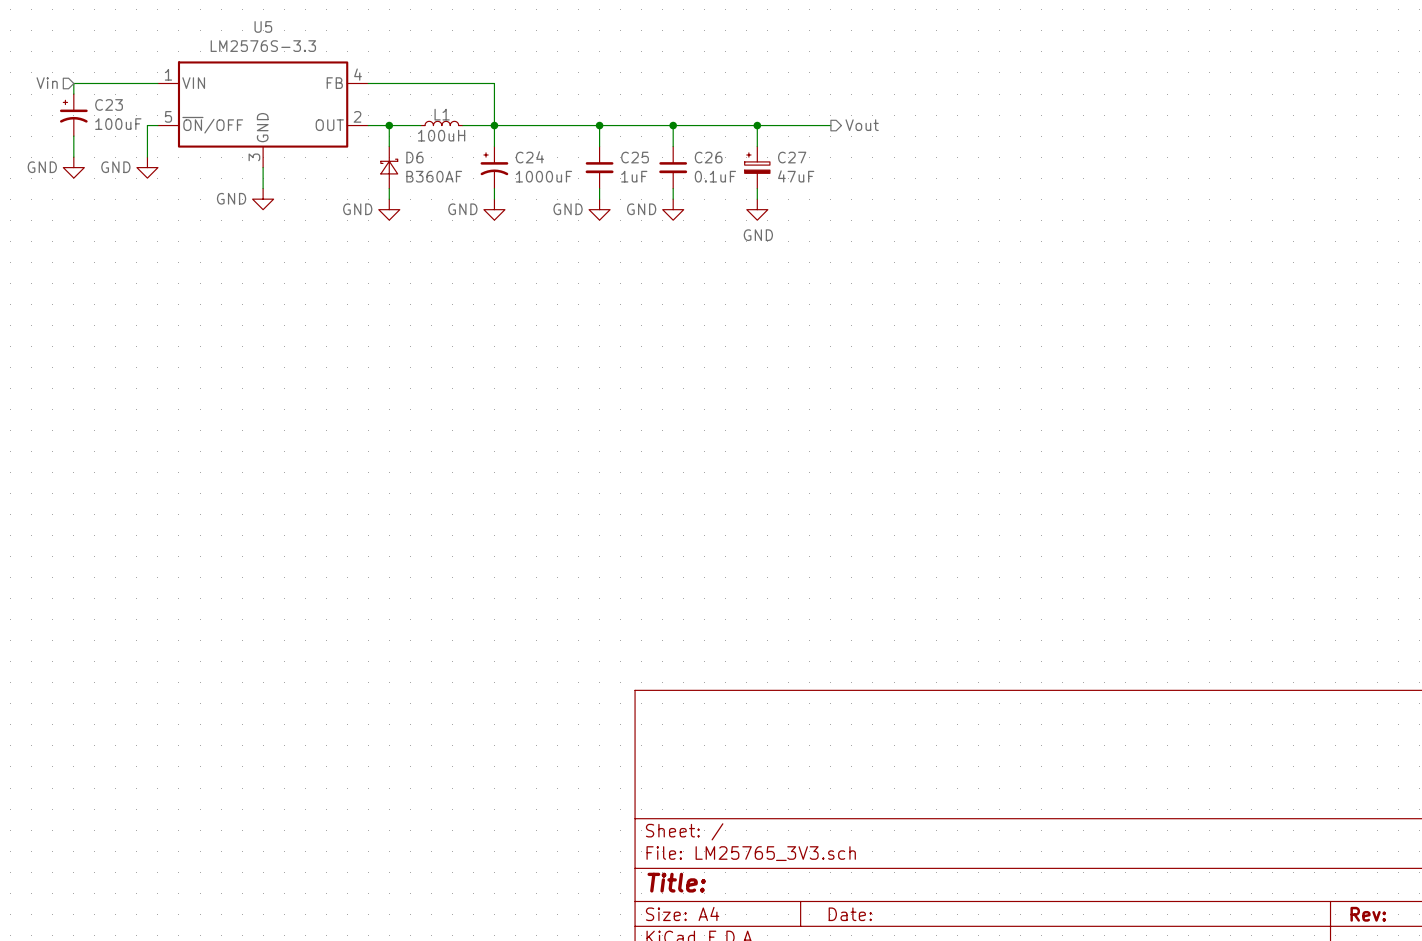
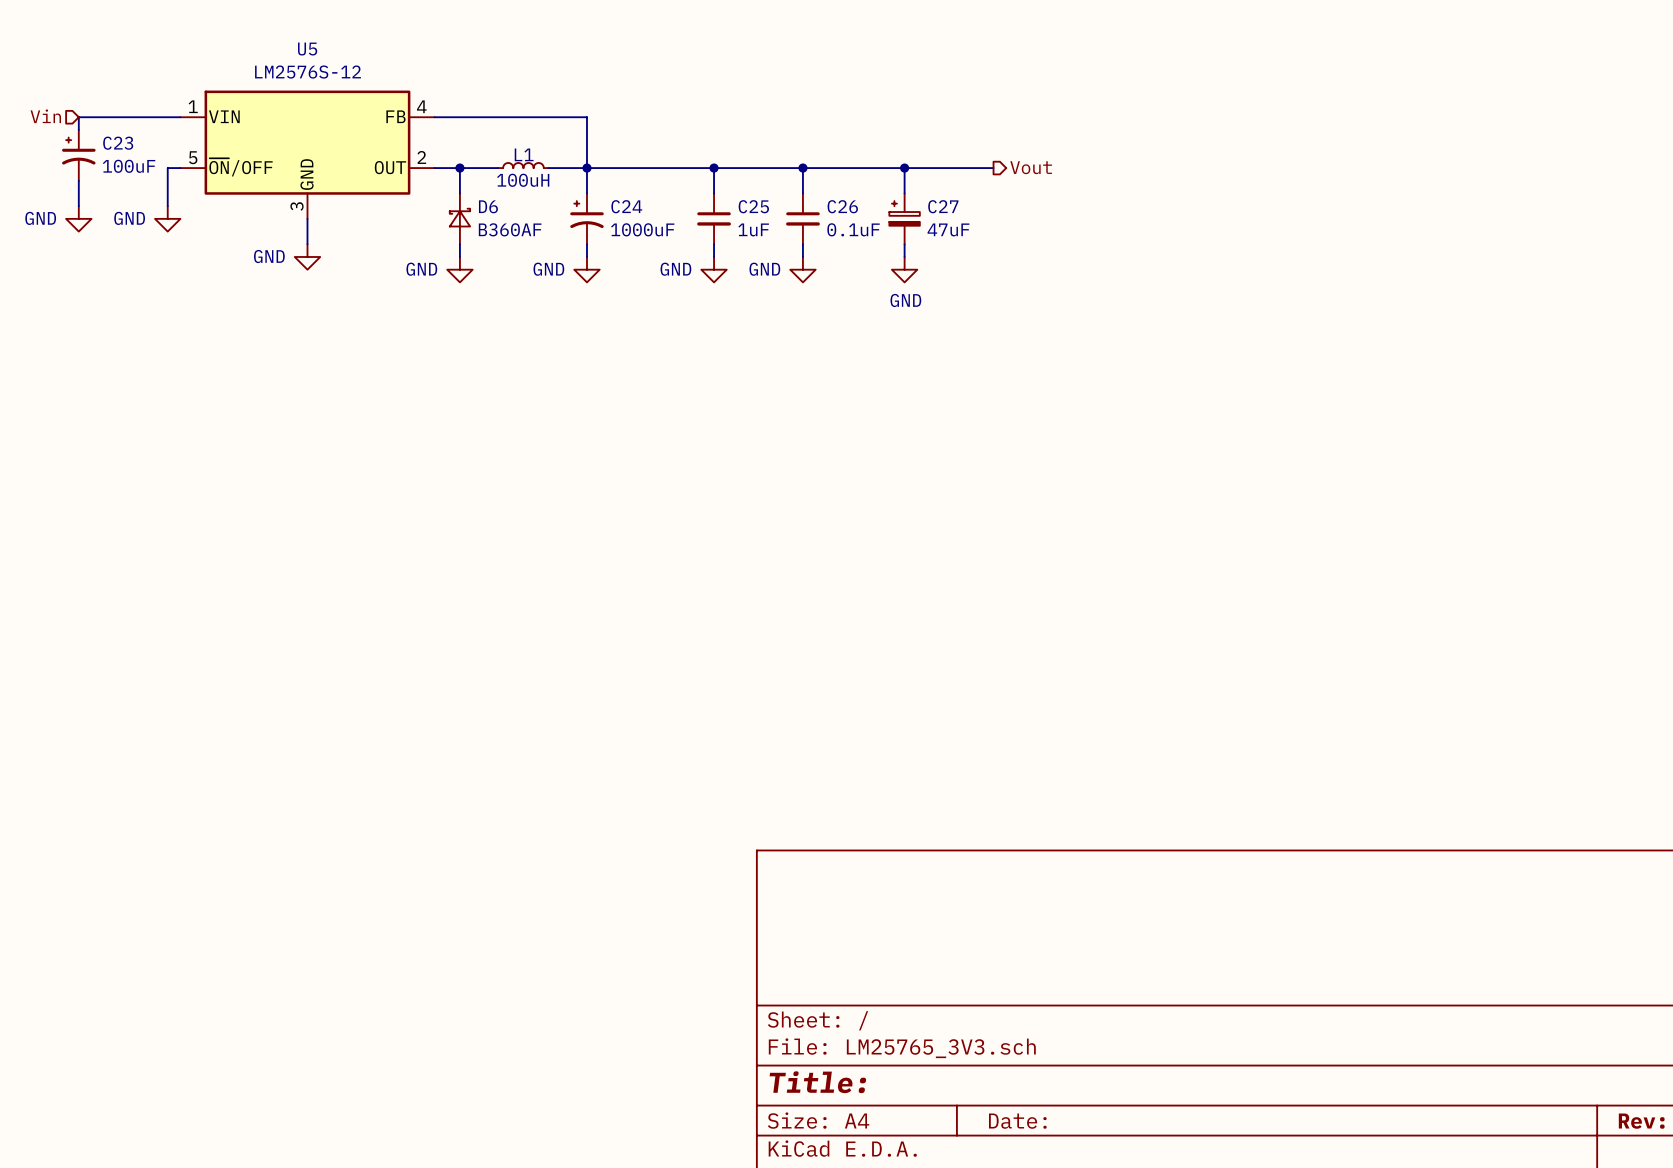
U5 value: LM2576S-3.3 (263, 46) -> LM2576S-12 (308, 72)

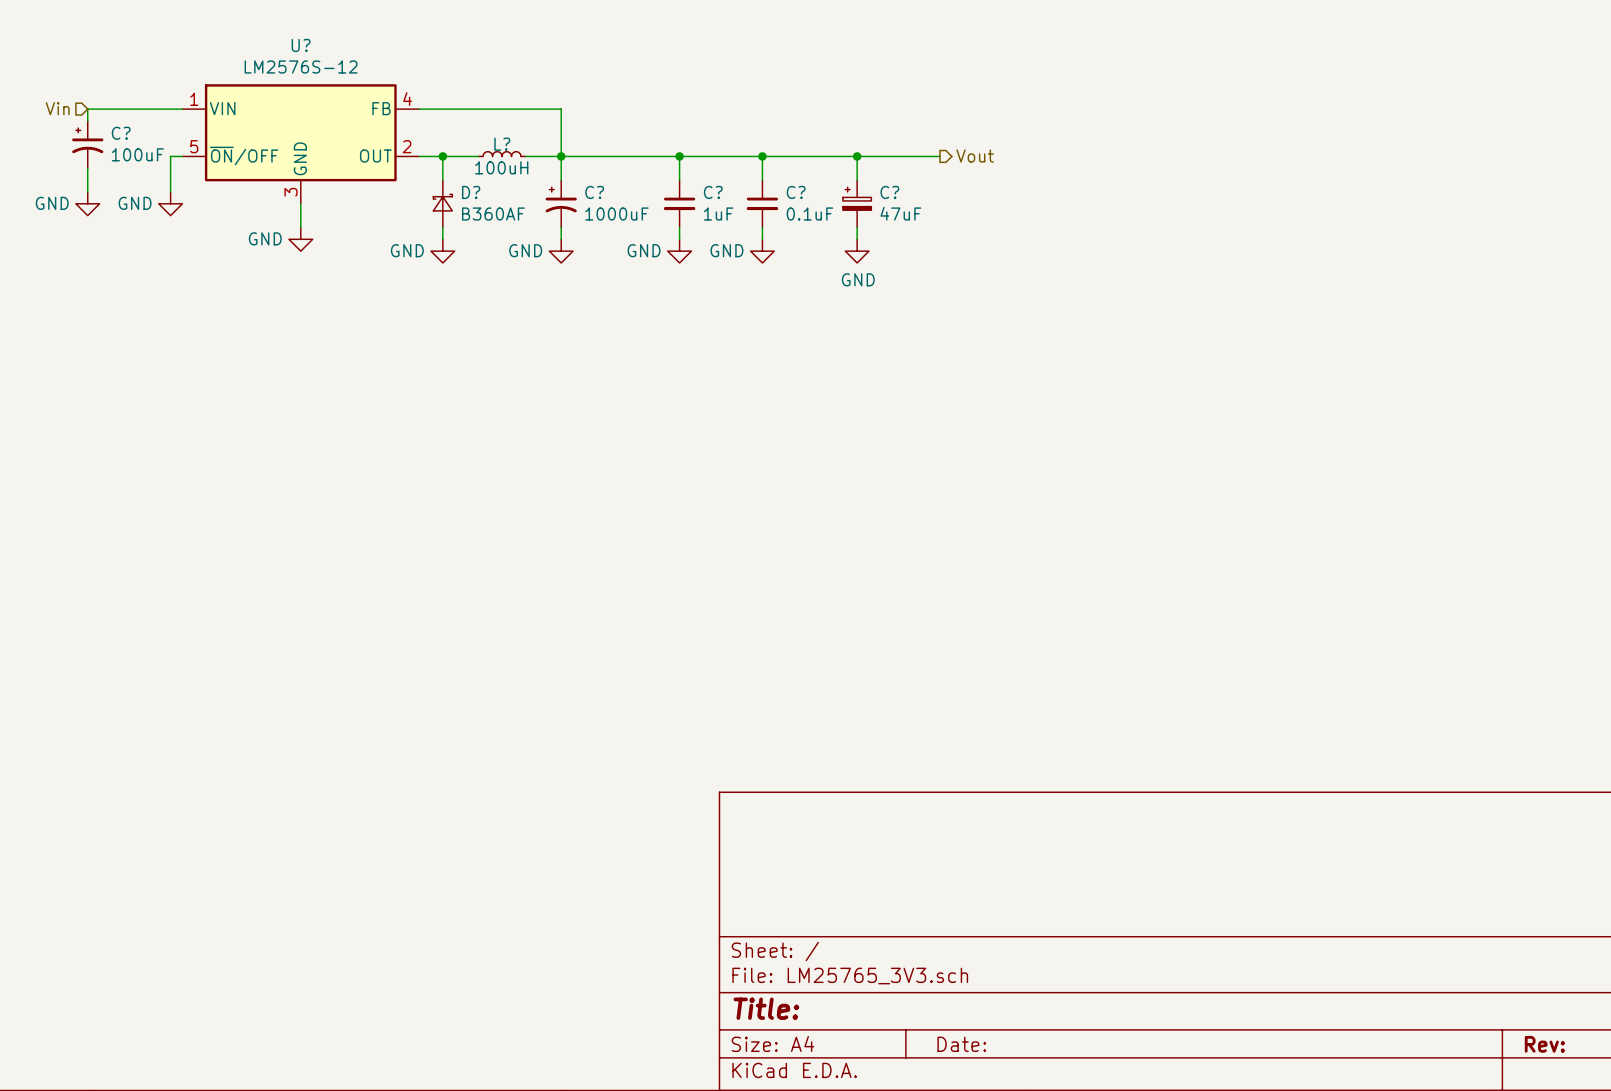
U5 name: U5 (307, 49) -> U? (301, 45)
C23 name: C23 (118, 143) -> C? (121, 133)
L1 name: L1 (524, 154) -> L? (502, 144)
D6 name: D6 (488, 206) -> D? (471, 192)
C24 name: C24 (626, 206) -> C? (594, 192)
C25 name: C25 (753, 206) -> C? (713, 192)
C26 name: C26 (842, 206) -> C? (796, 192)
C27 name: C27 (943, 206) -> C? (889, 192)

